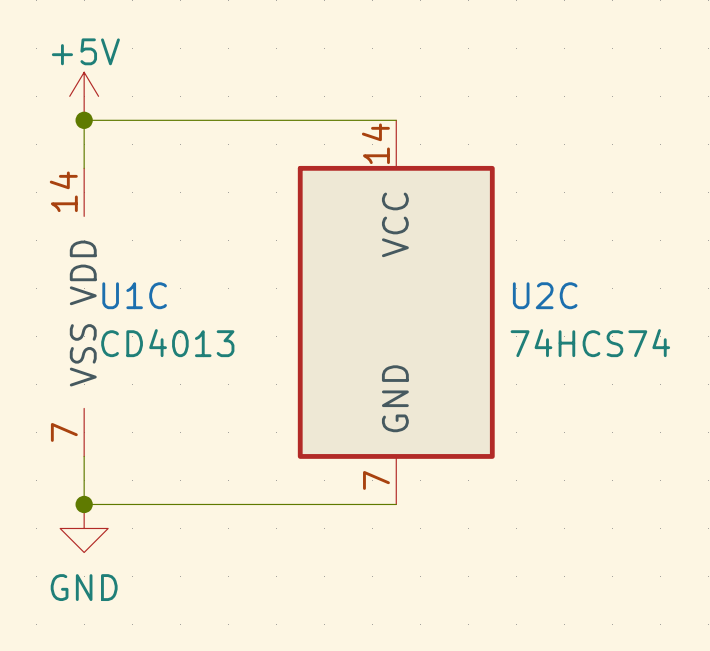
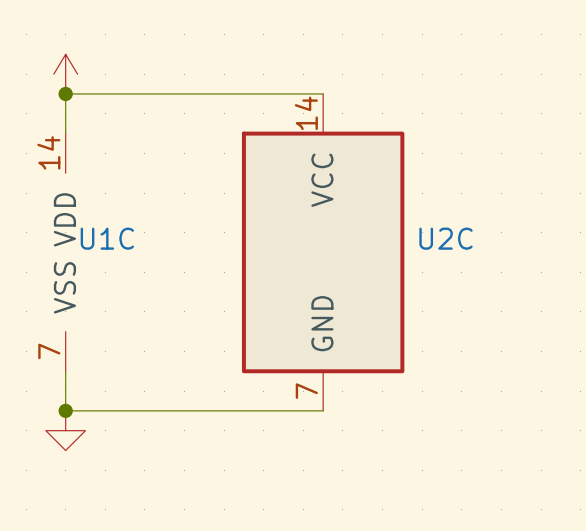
power symbol text: +5V (85, 51) -> none
U1C value: CD4013 (167, 343) -> none
U2C value: 74HCS74 (590, 343) -> none
power symbol text: GND (84, 587) -> none

